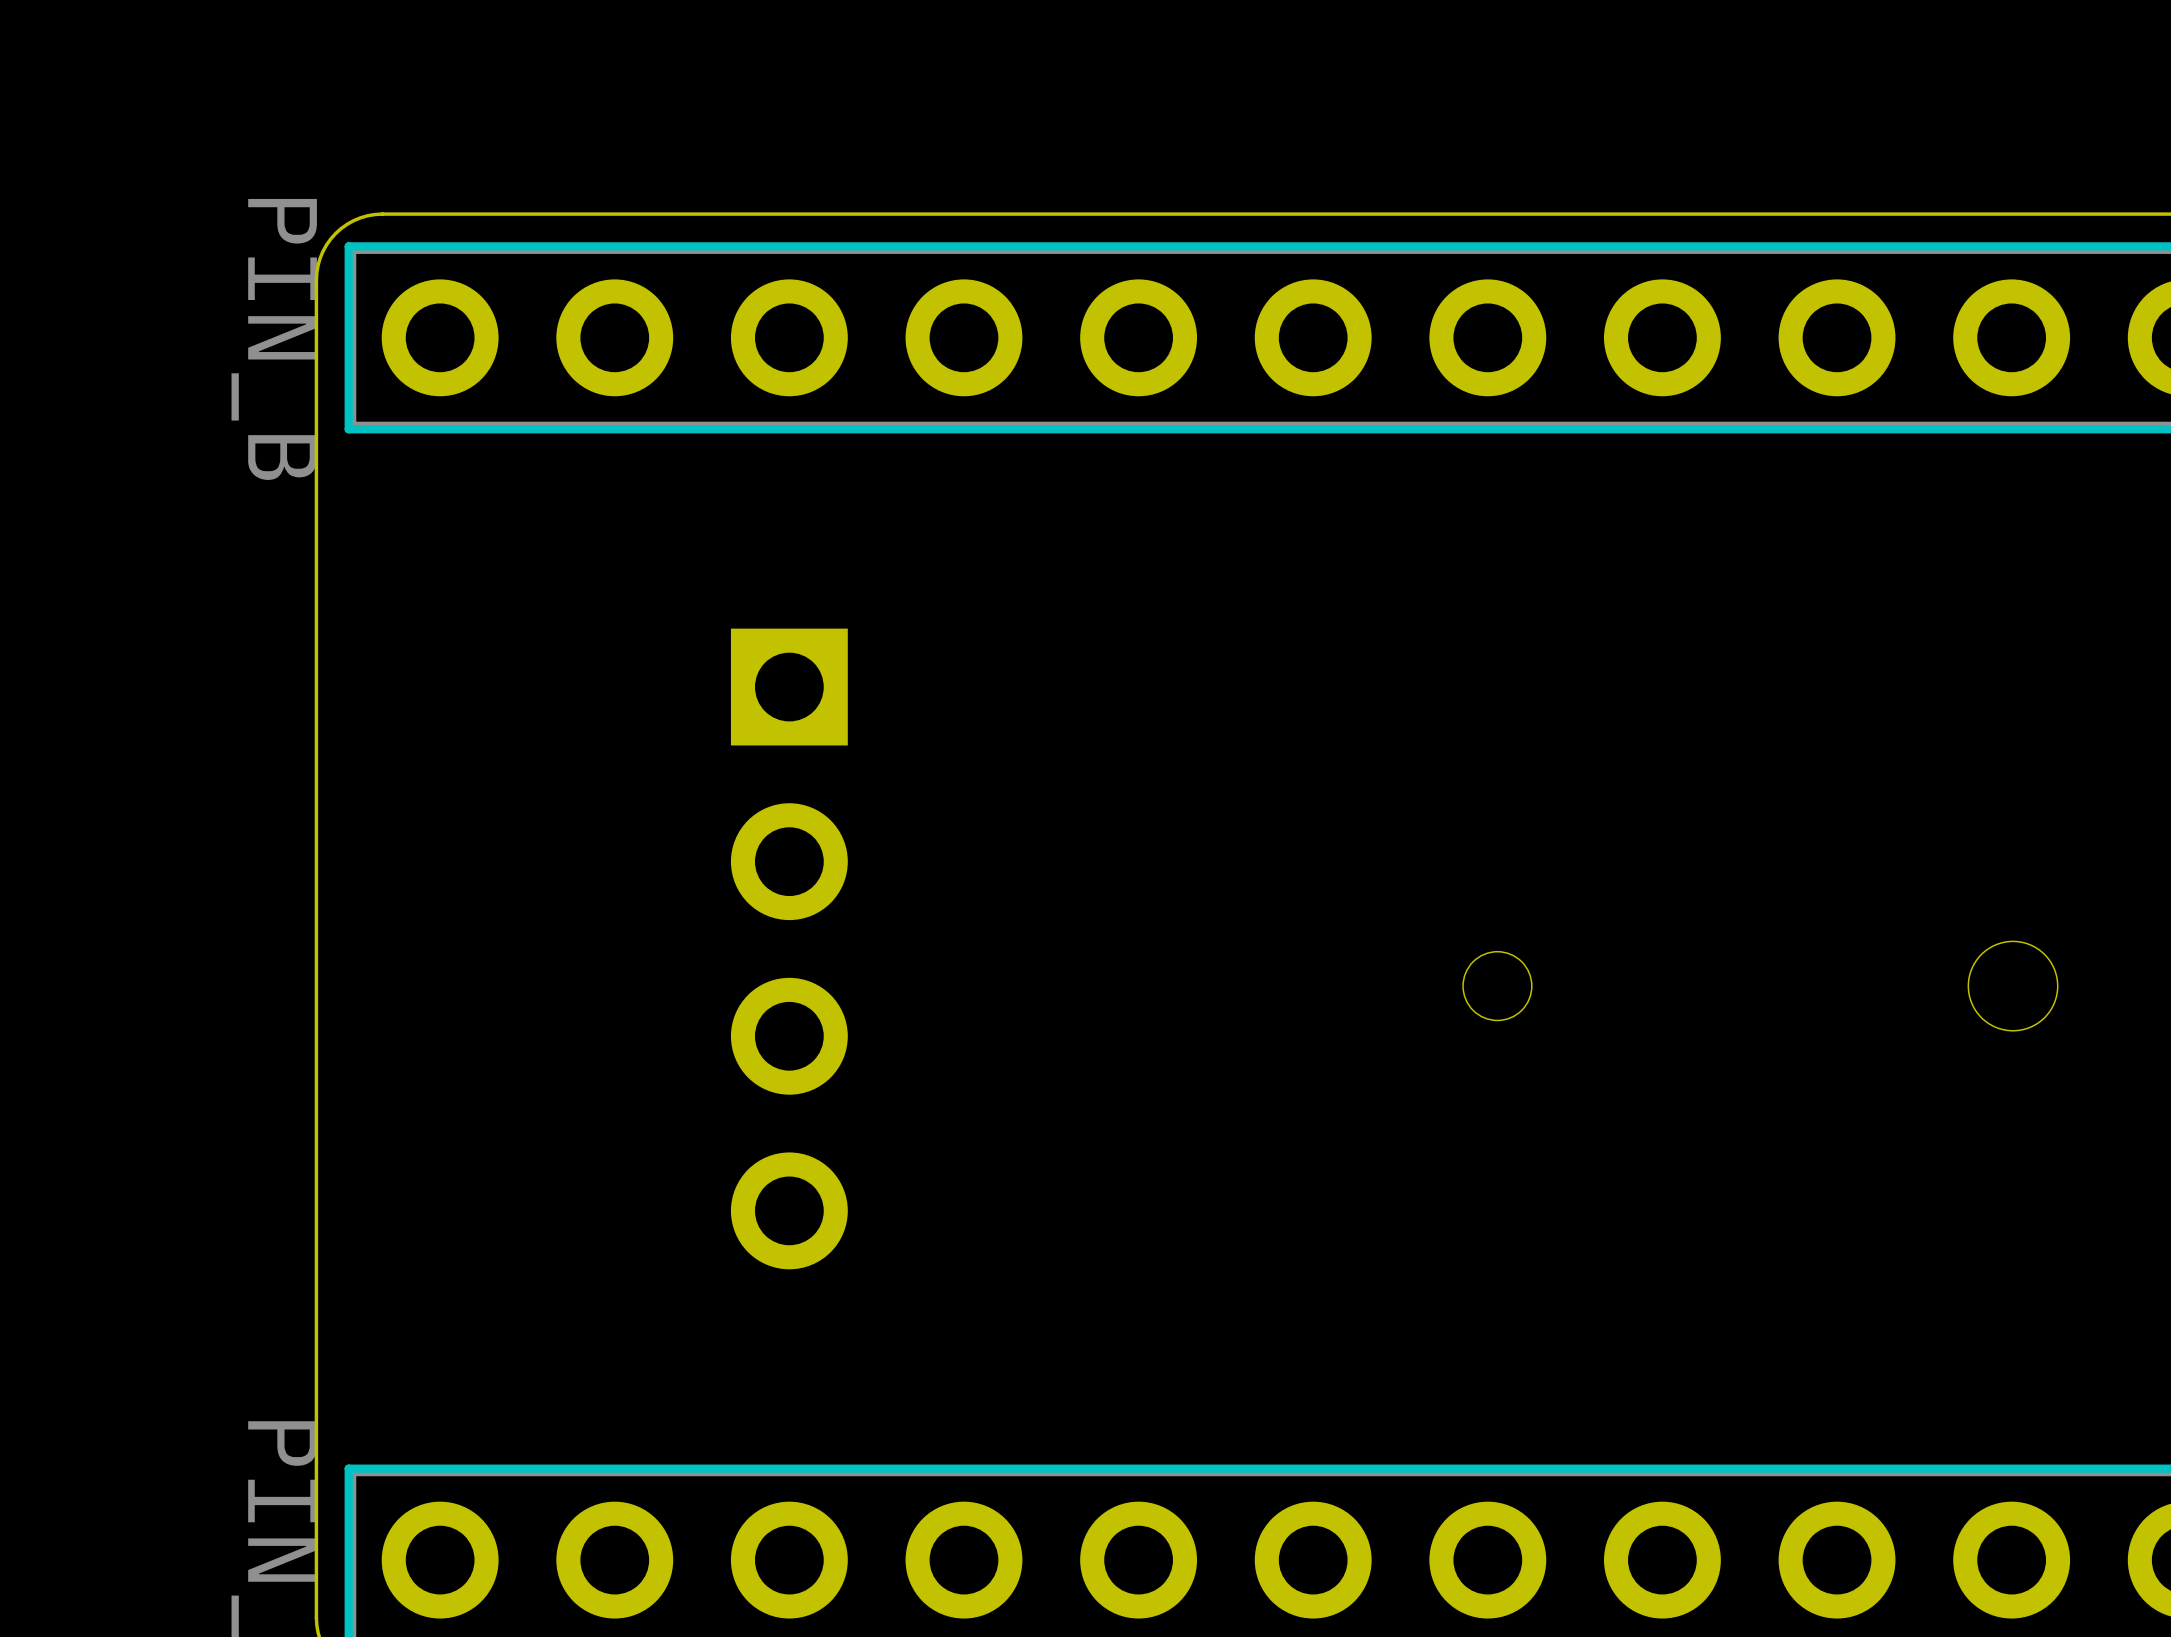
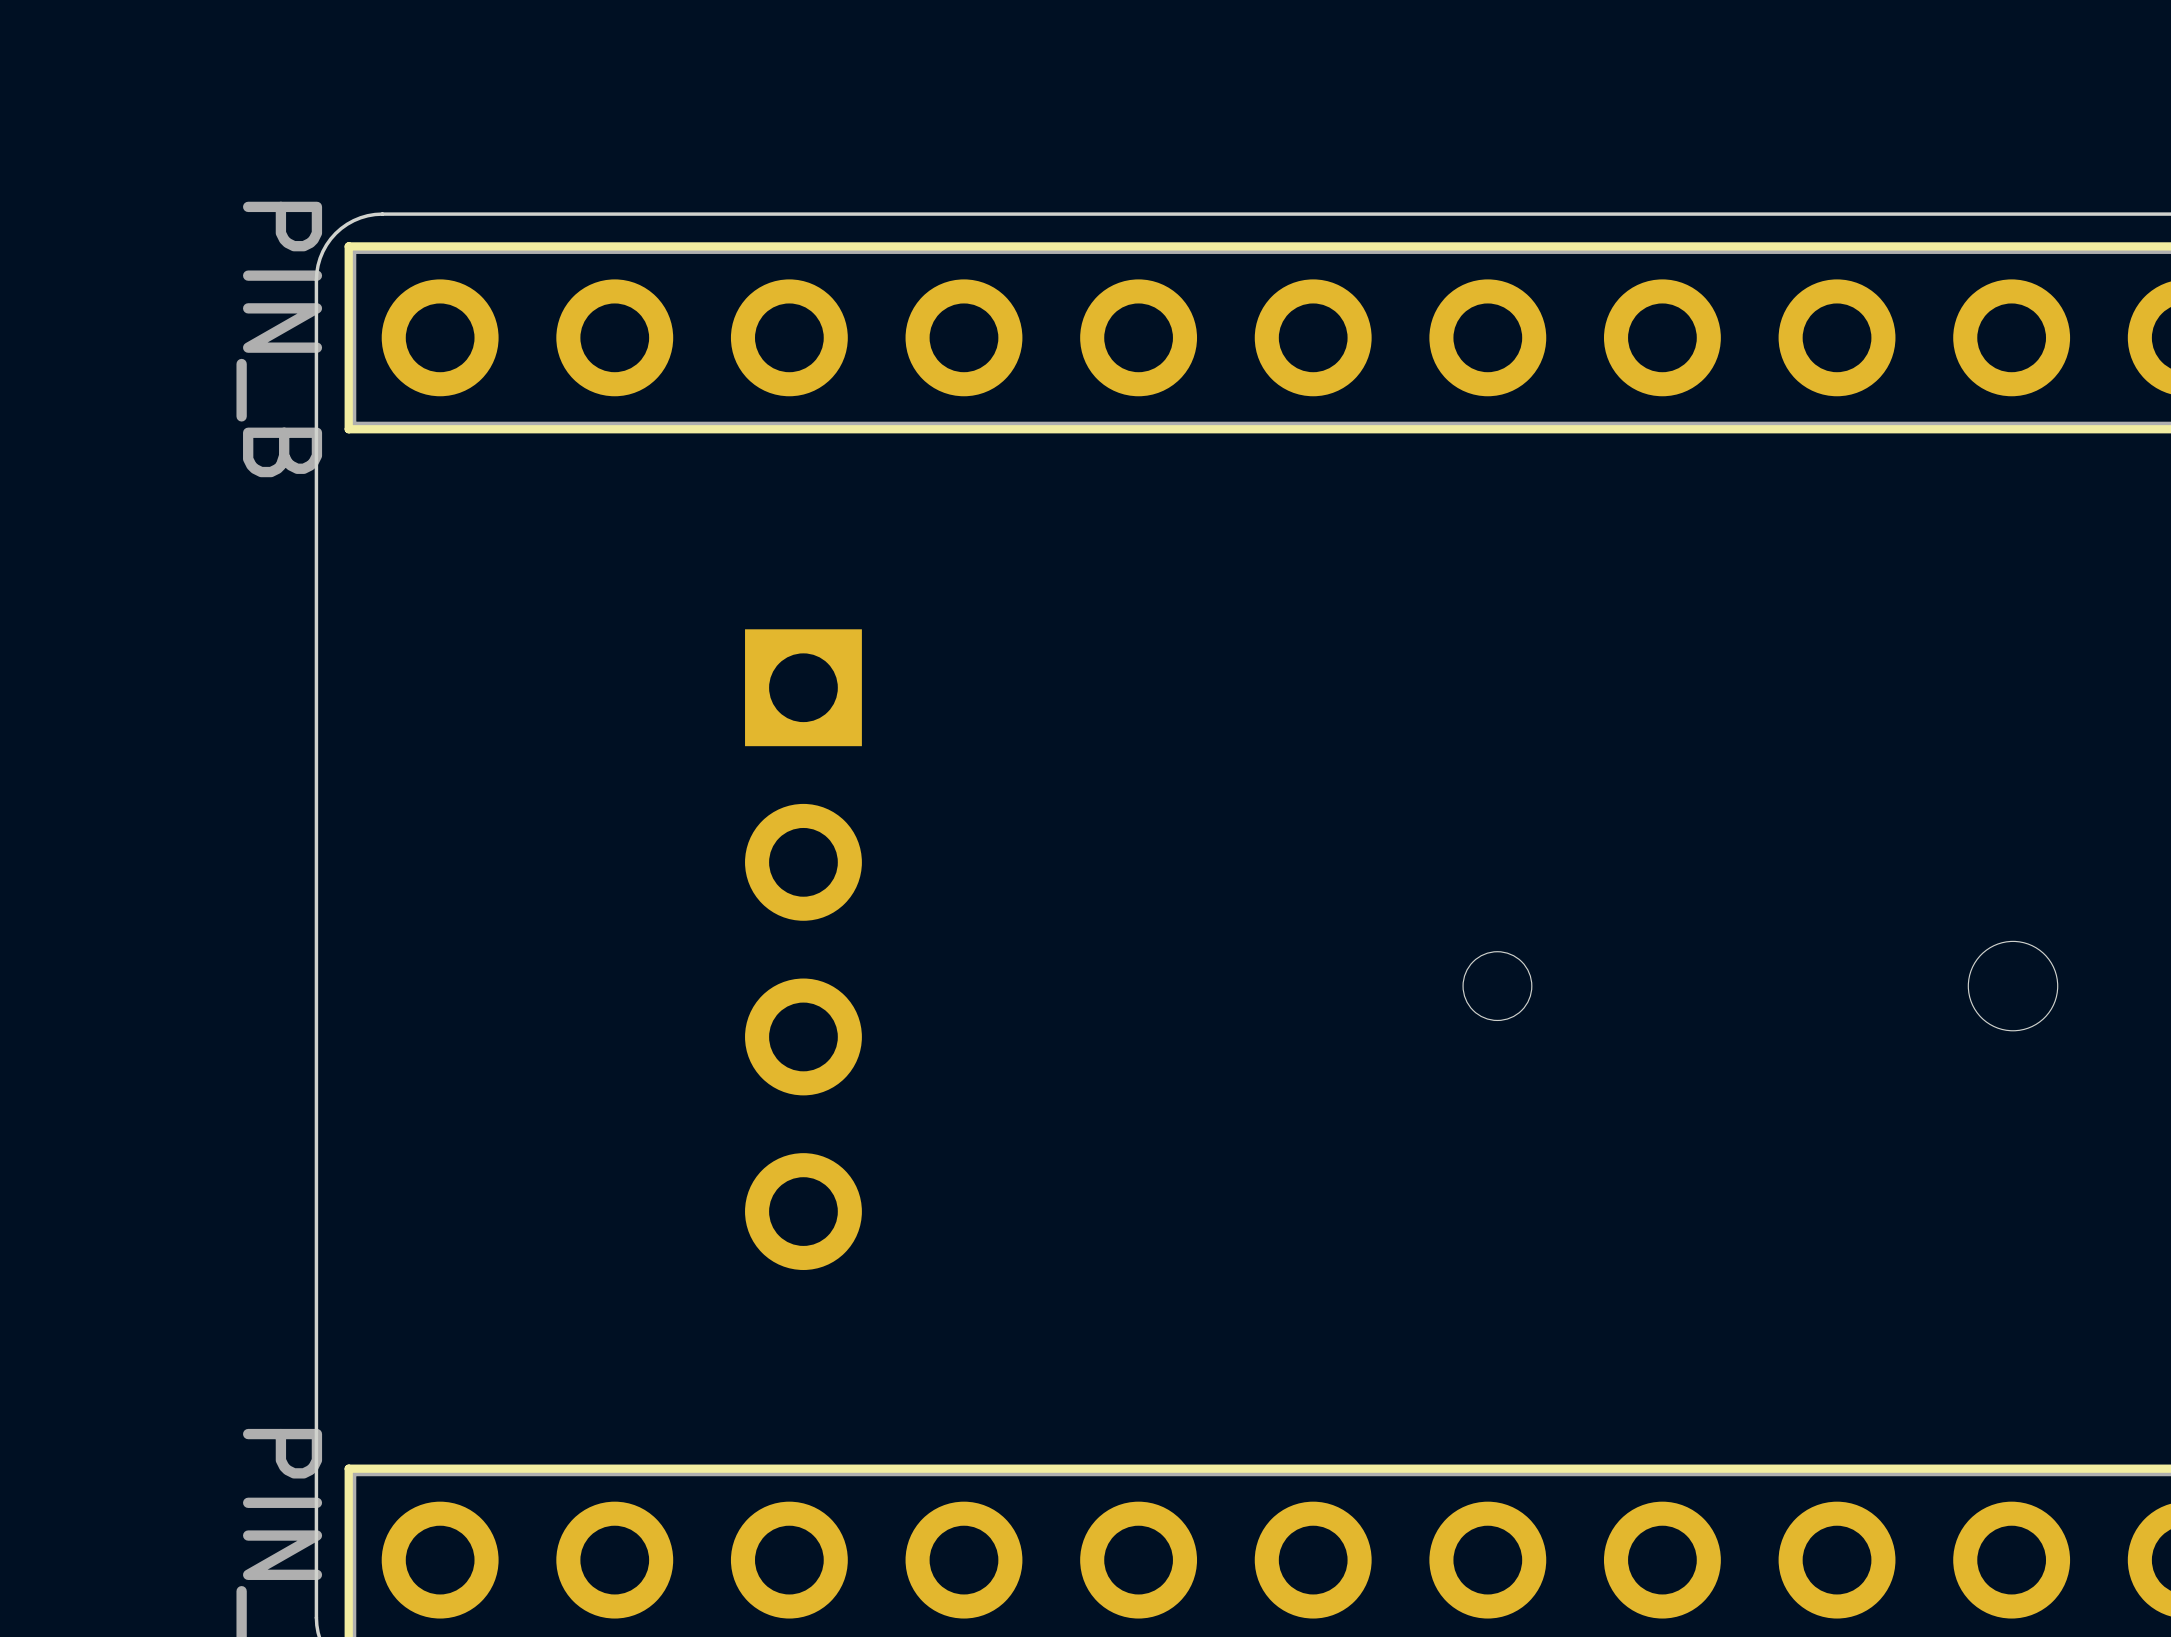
part position: (789, 948) -> (803, 949)

